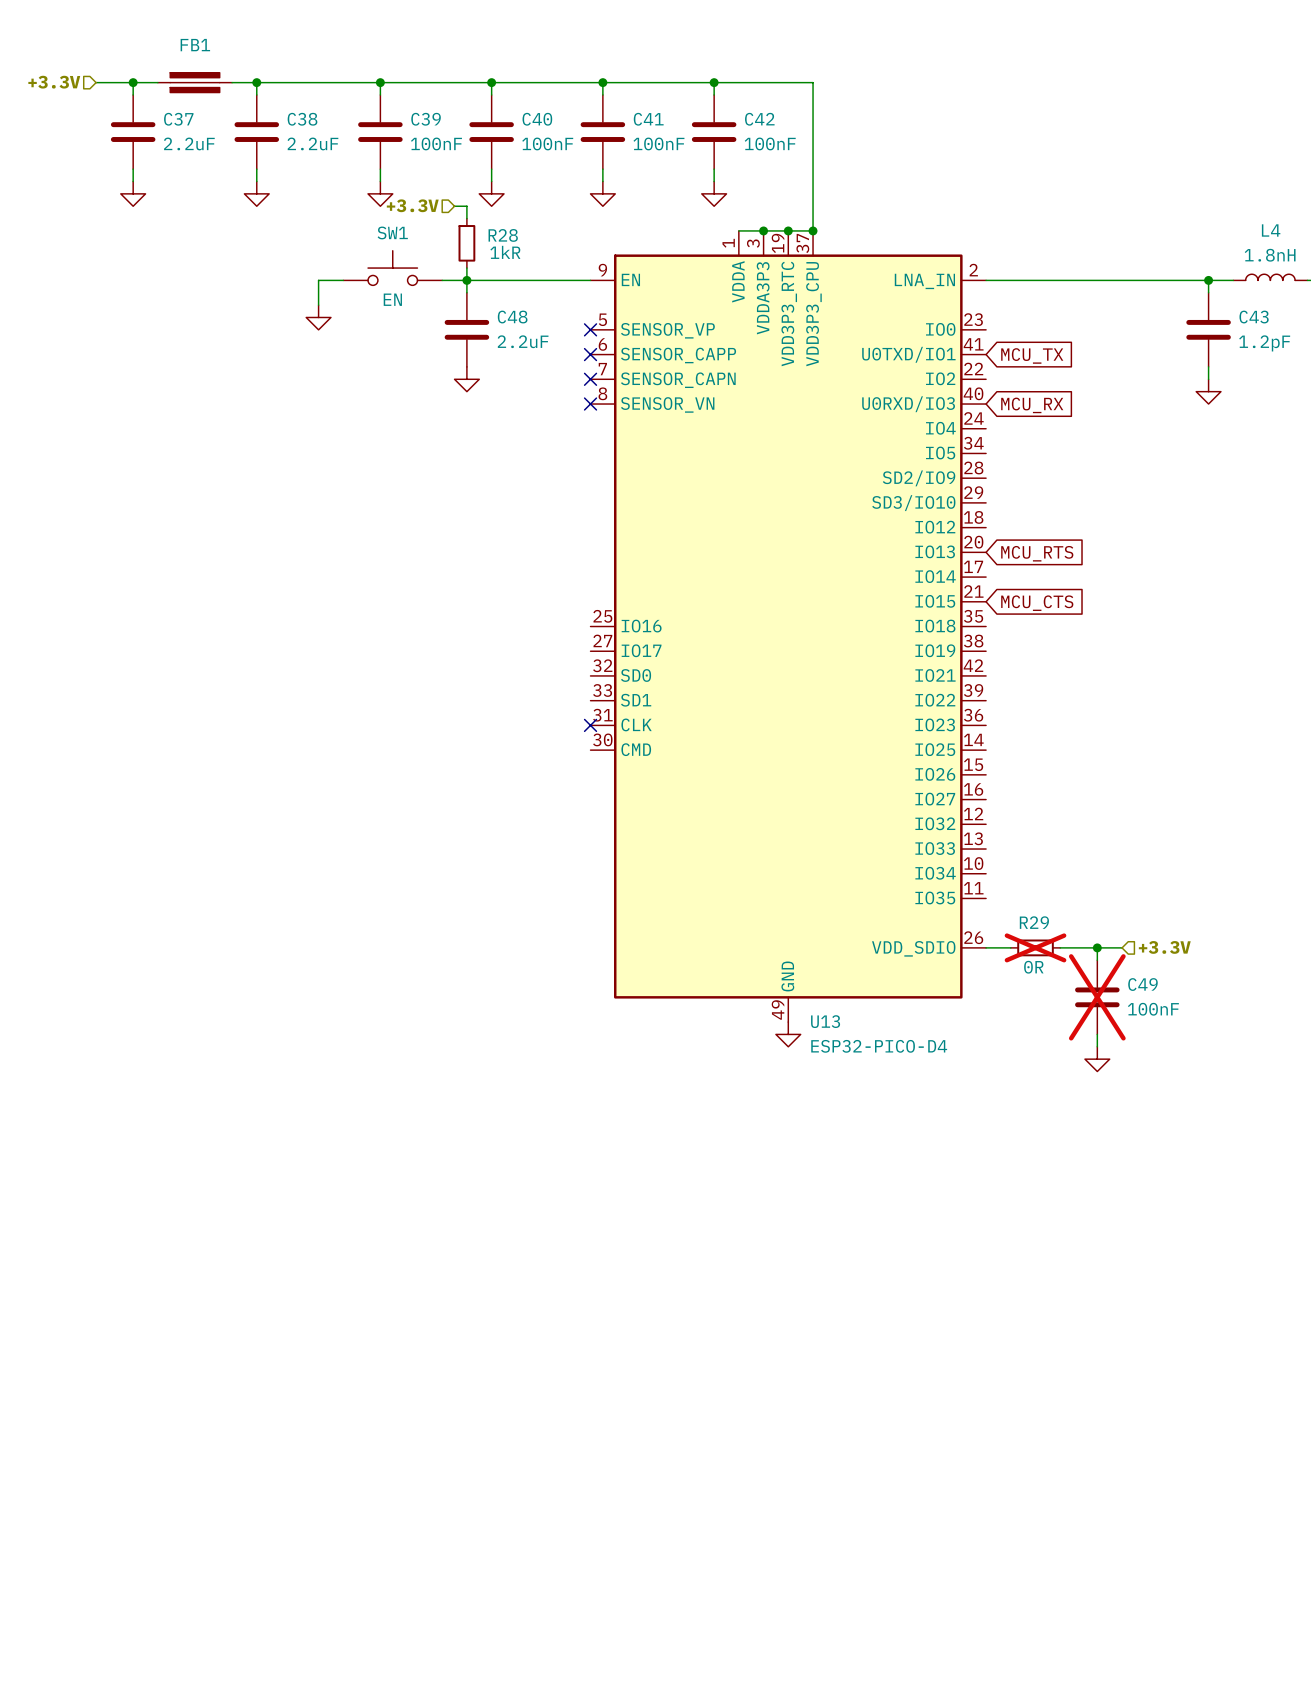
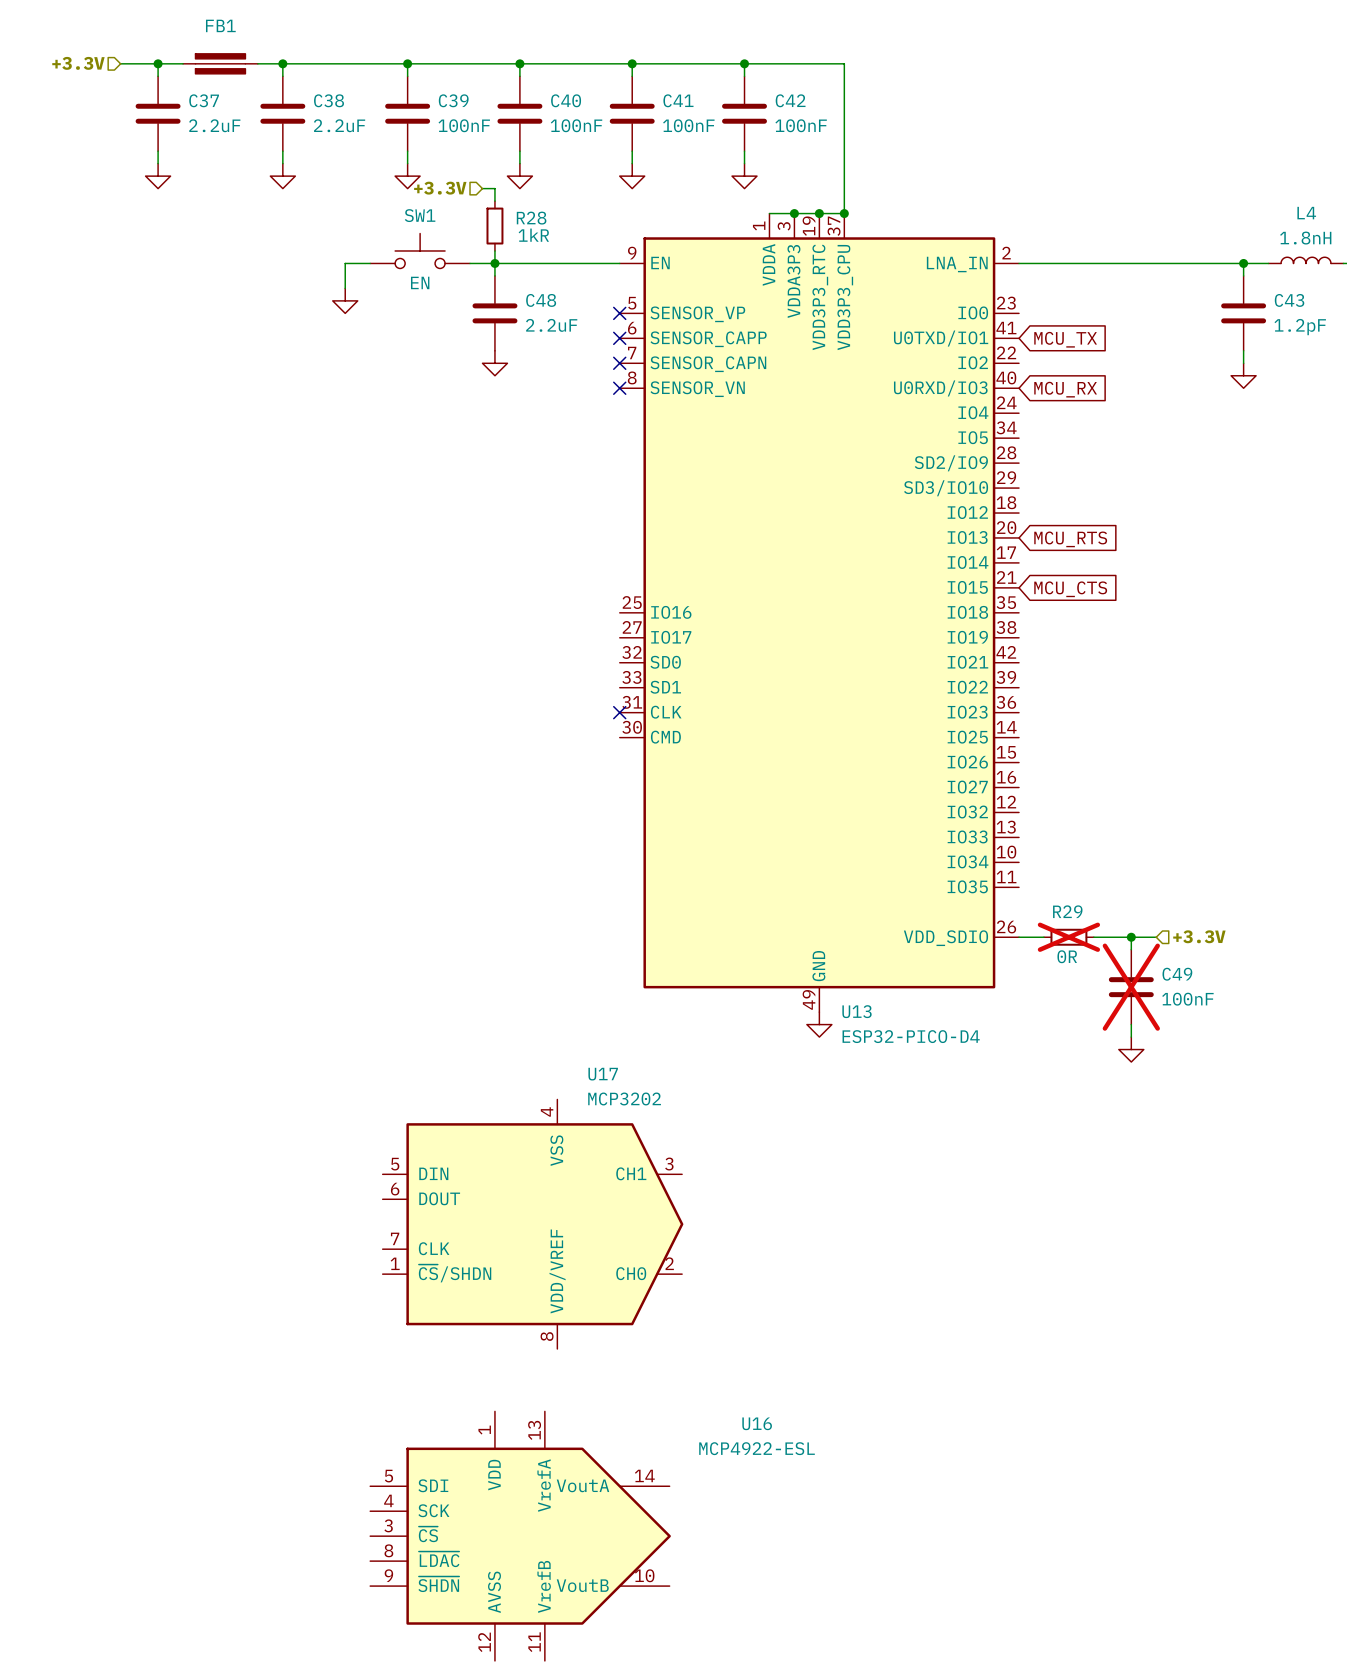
U17: none -> MCP3202 (533, 1224)
U16: none -> MCP4922-ESL (520, 1536)

